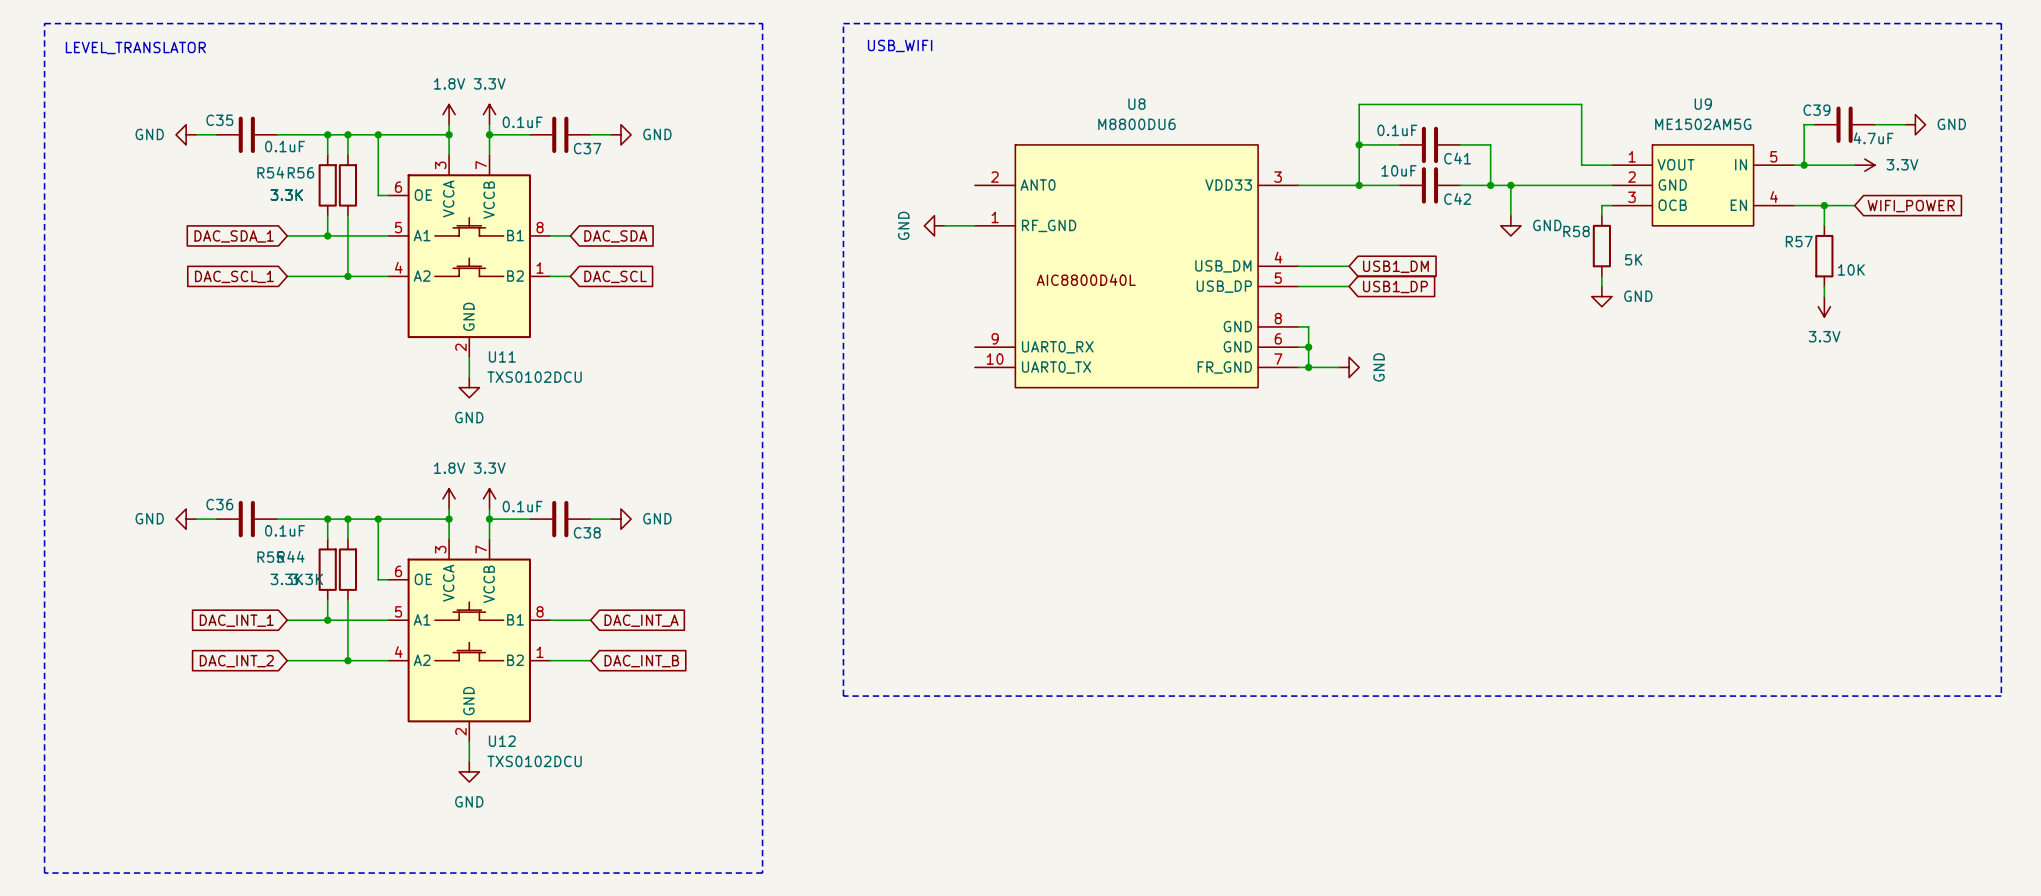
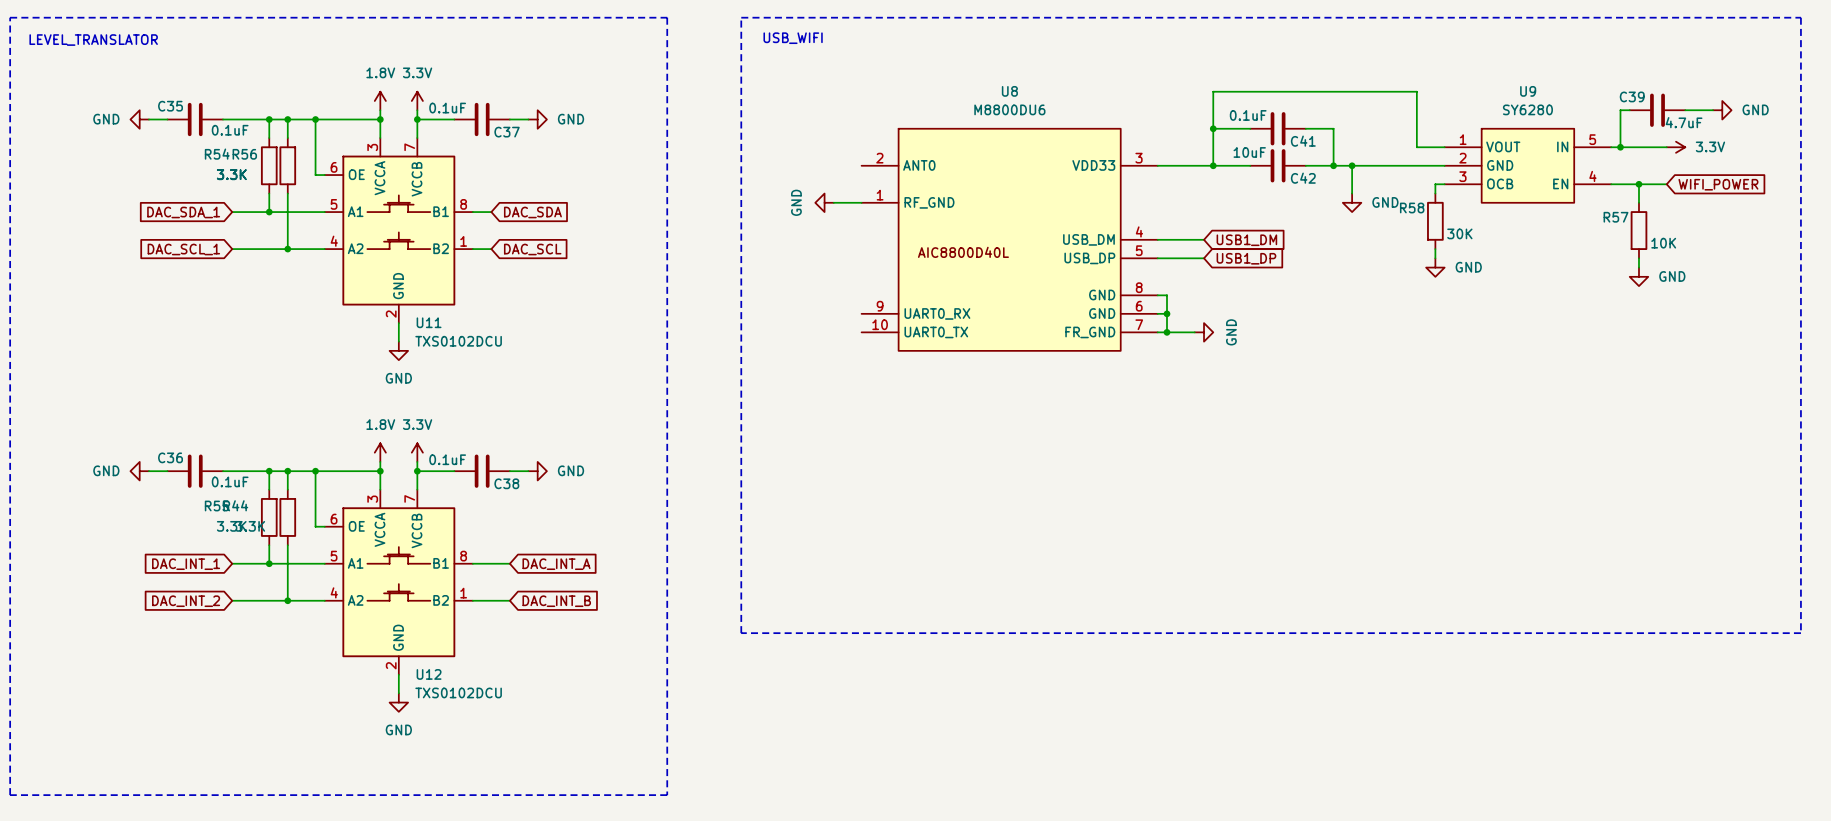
U9 value: ME1502AM5G (1703, 124) -> SY6280 (1527, 109)
R58 value: 5K (1633, 259) -> 30K (1459, 233)
power symbol: 3.3V (1824, 306) -> GND (1638, 276)

